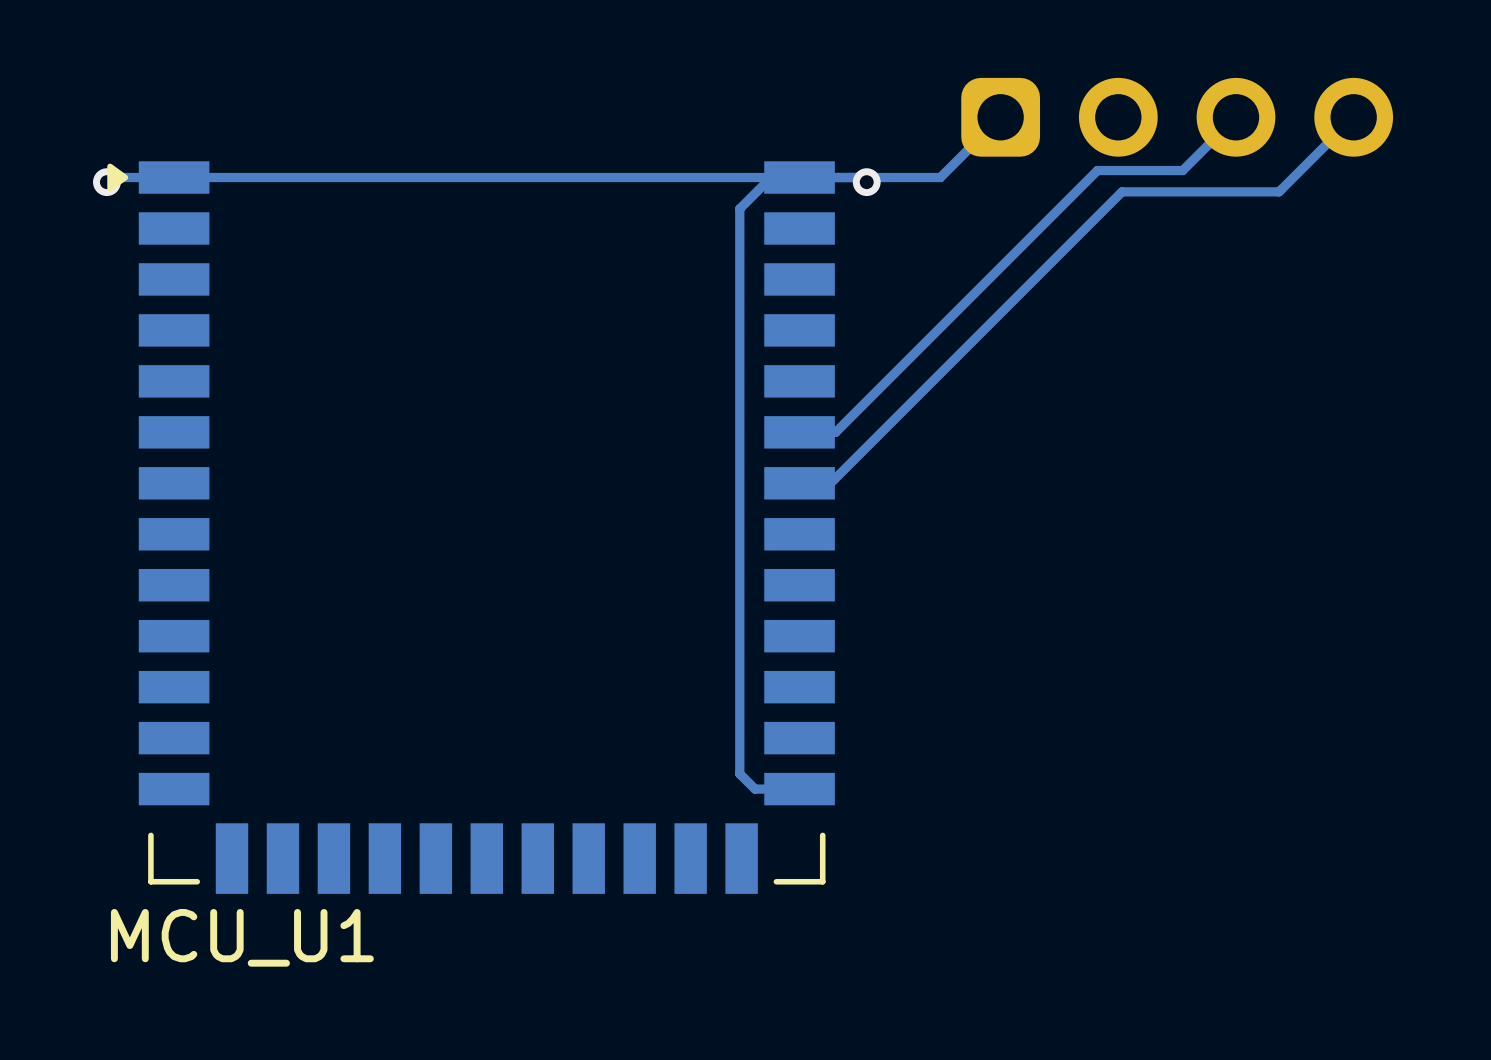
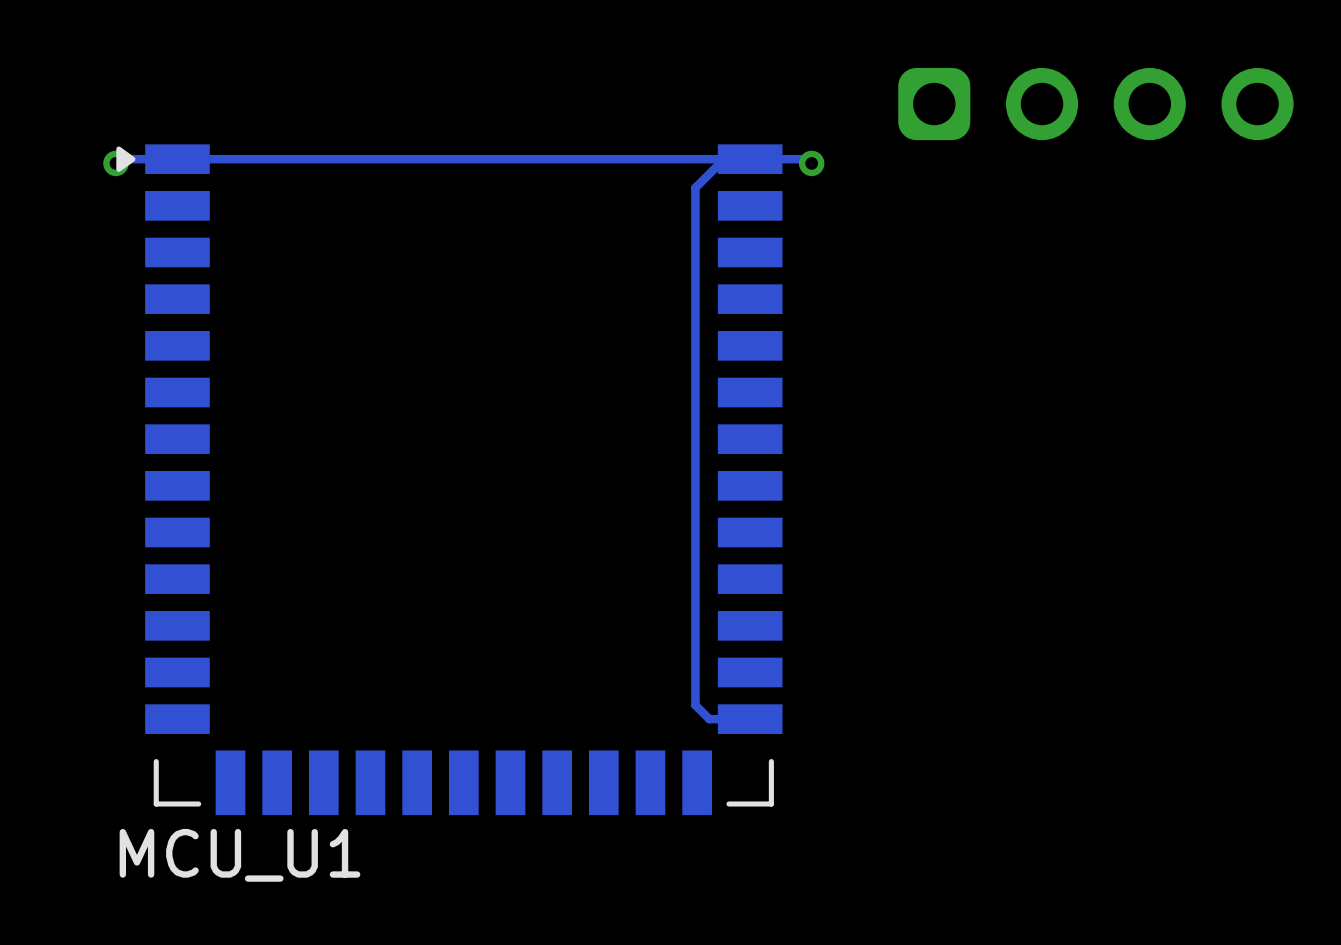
bottom track: (1000, 117) (940, 177) (862, 177) -> none
bottom track: (1235, 117) (1182, 170) (1097, 170) (835, 432) (799, 432) -> none
bottom track: (1353, 117) (1279, 191) (1122, 191) (830, 483) (799, 483) -> none

